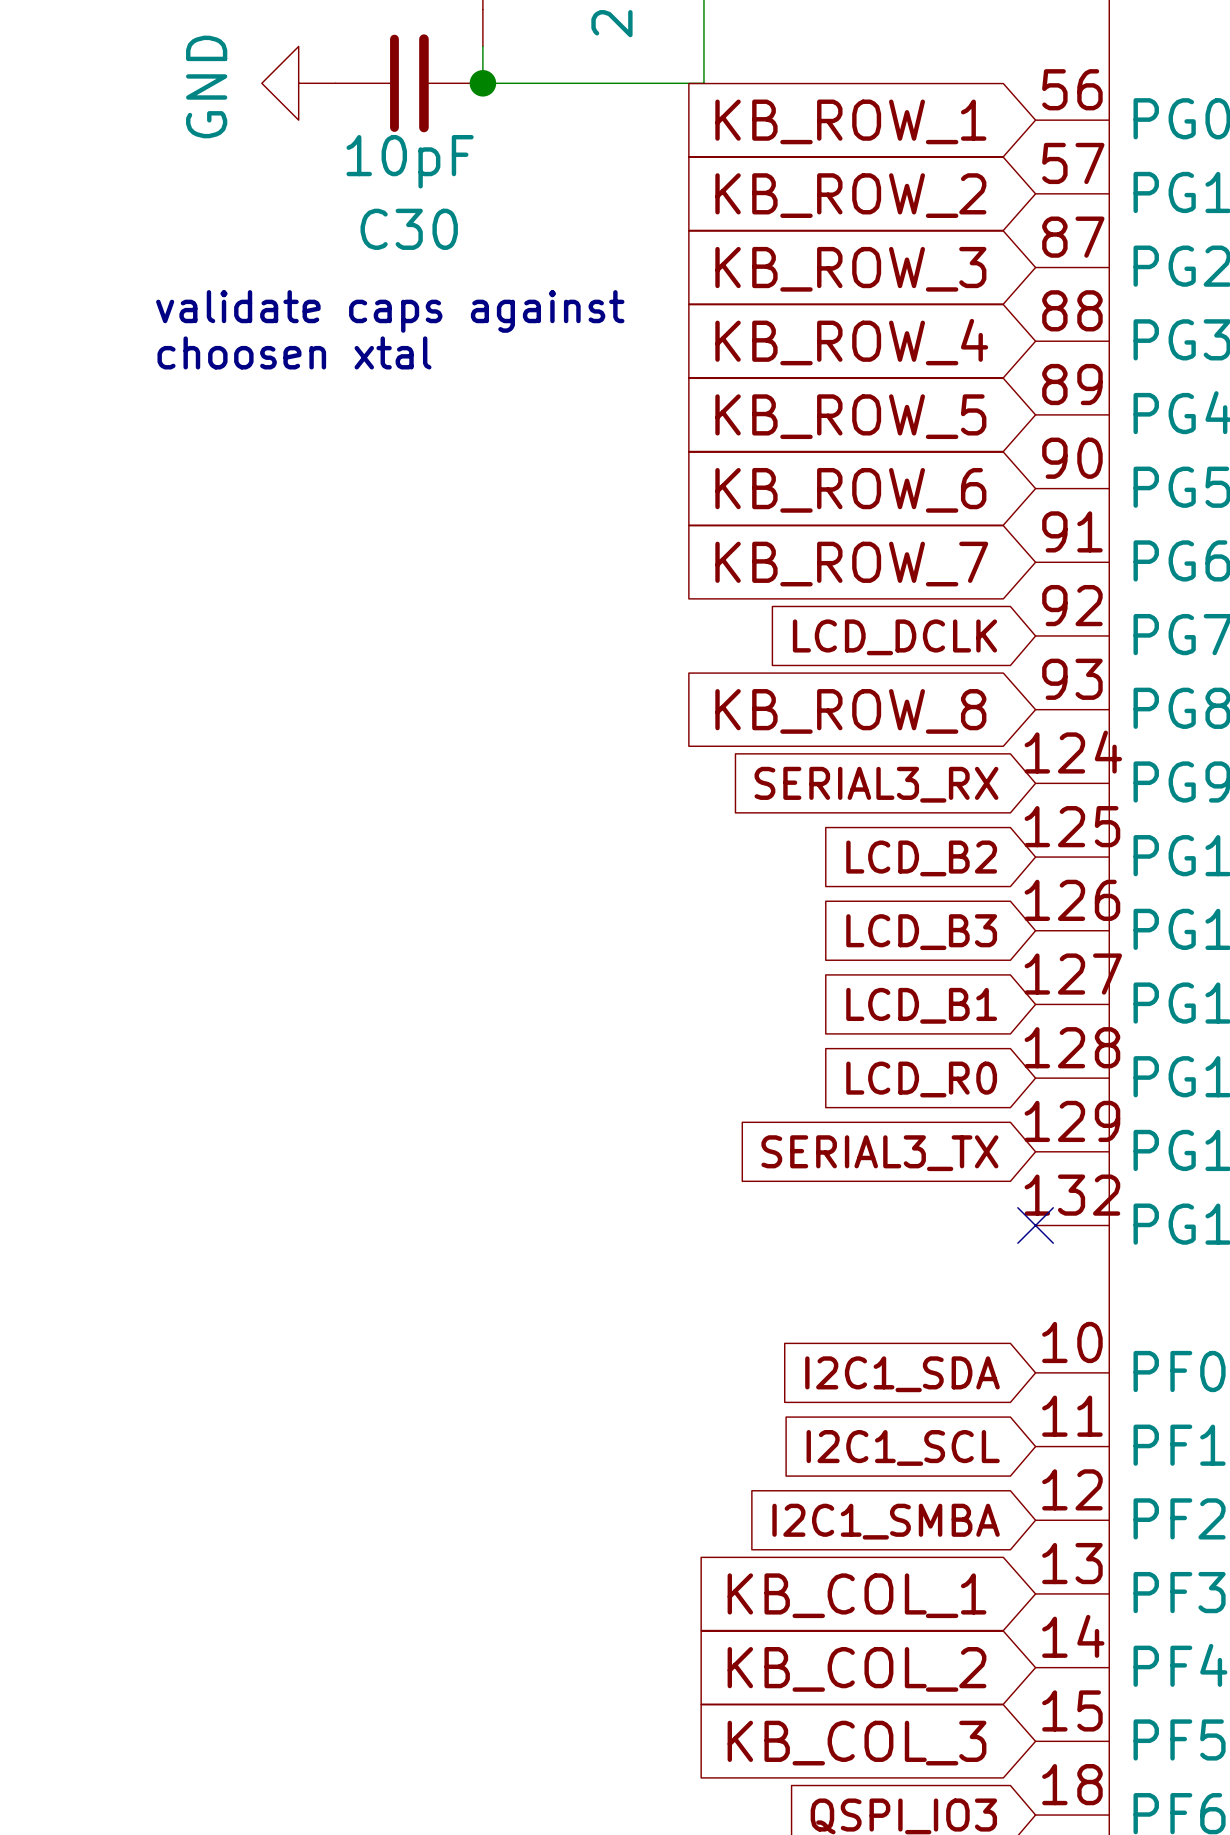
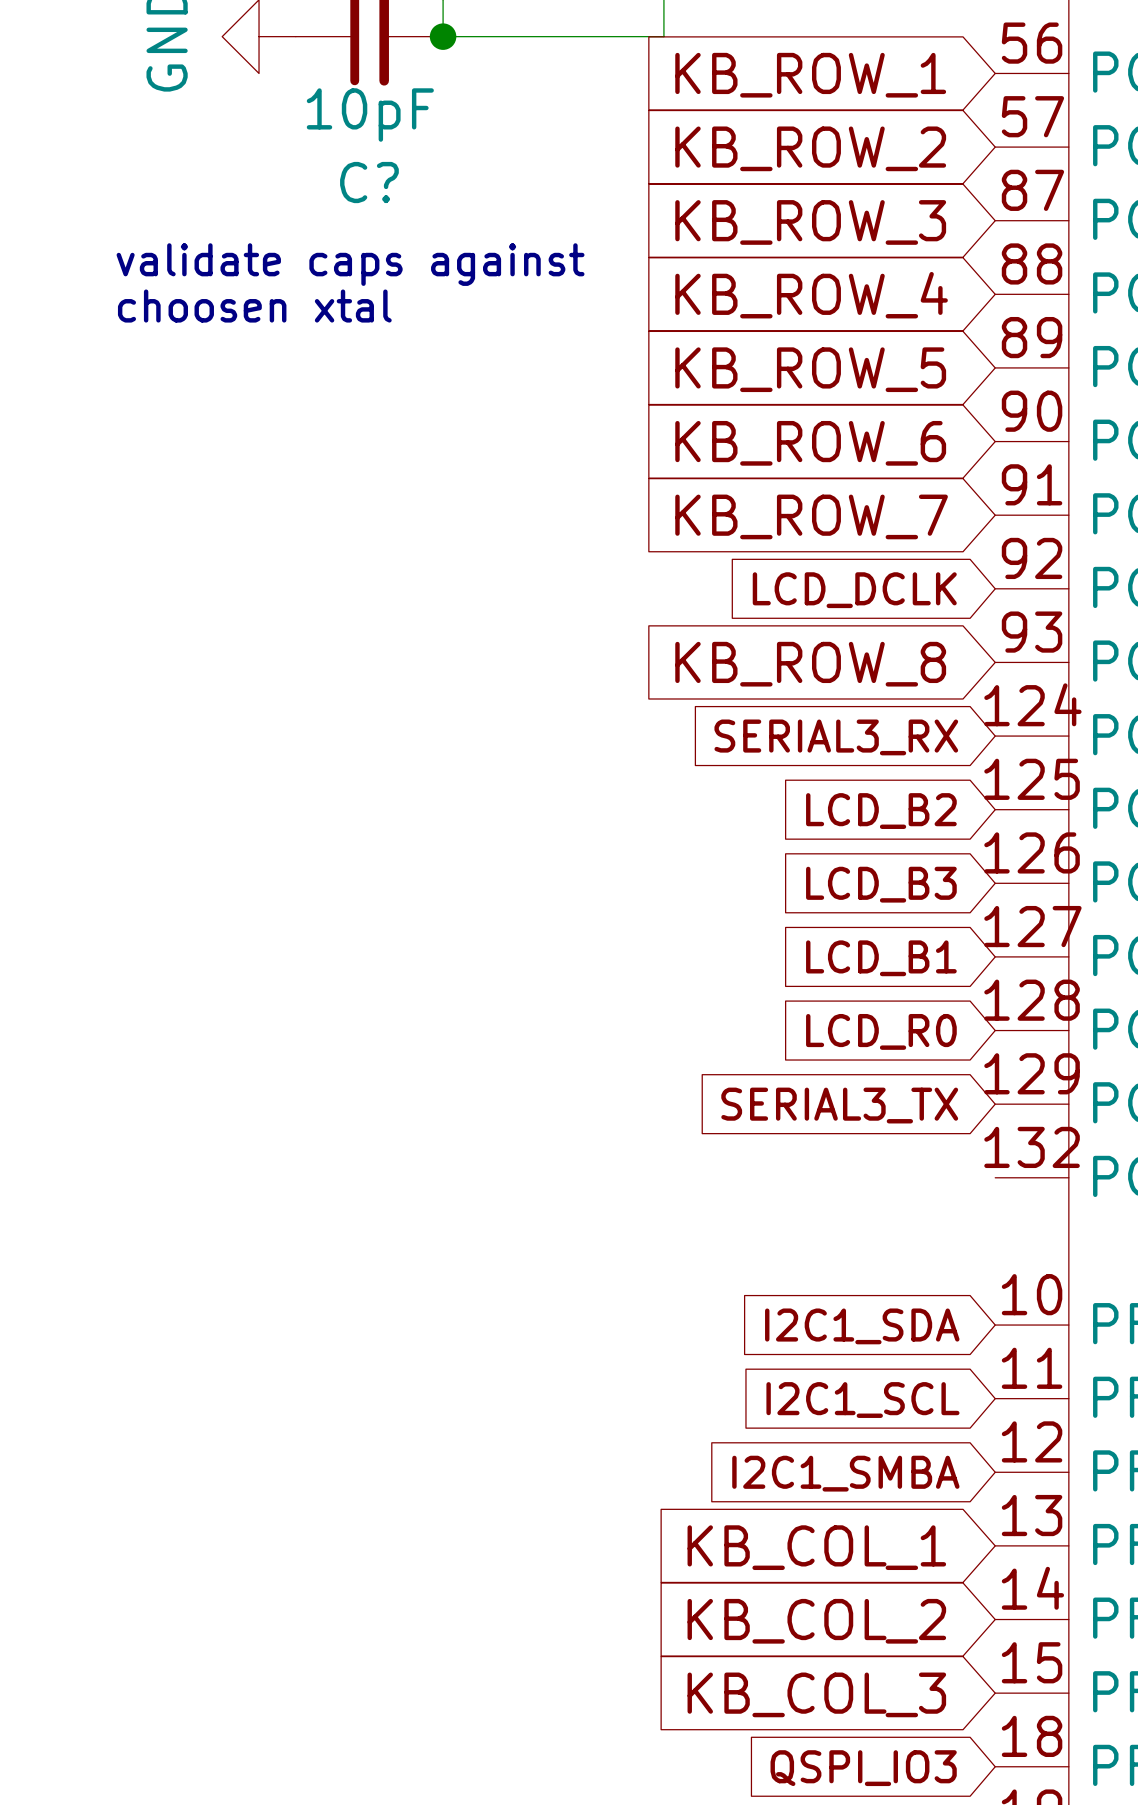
C30 name: C30 (409, 229) -> C? (369, 182)
no-connect mark: (1035, 1225) -> none

